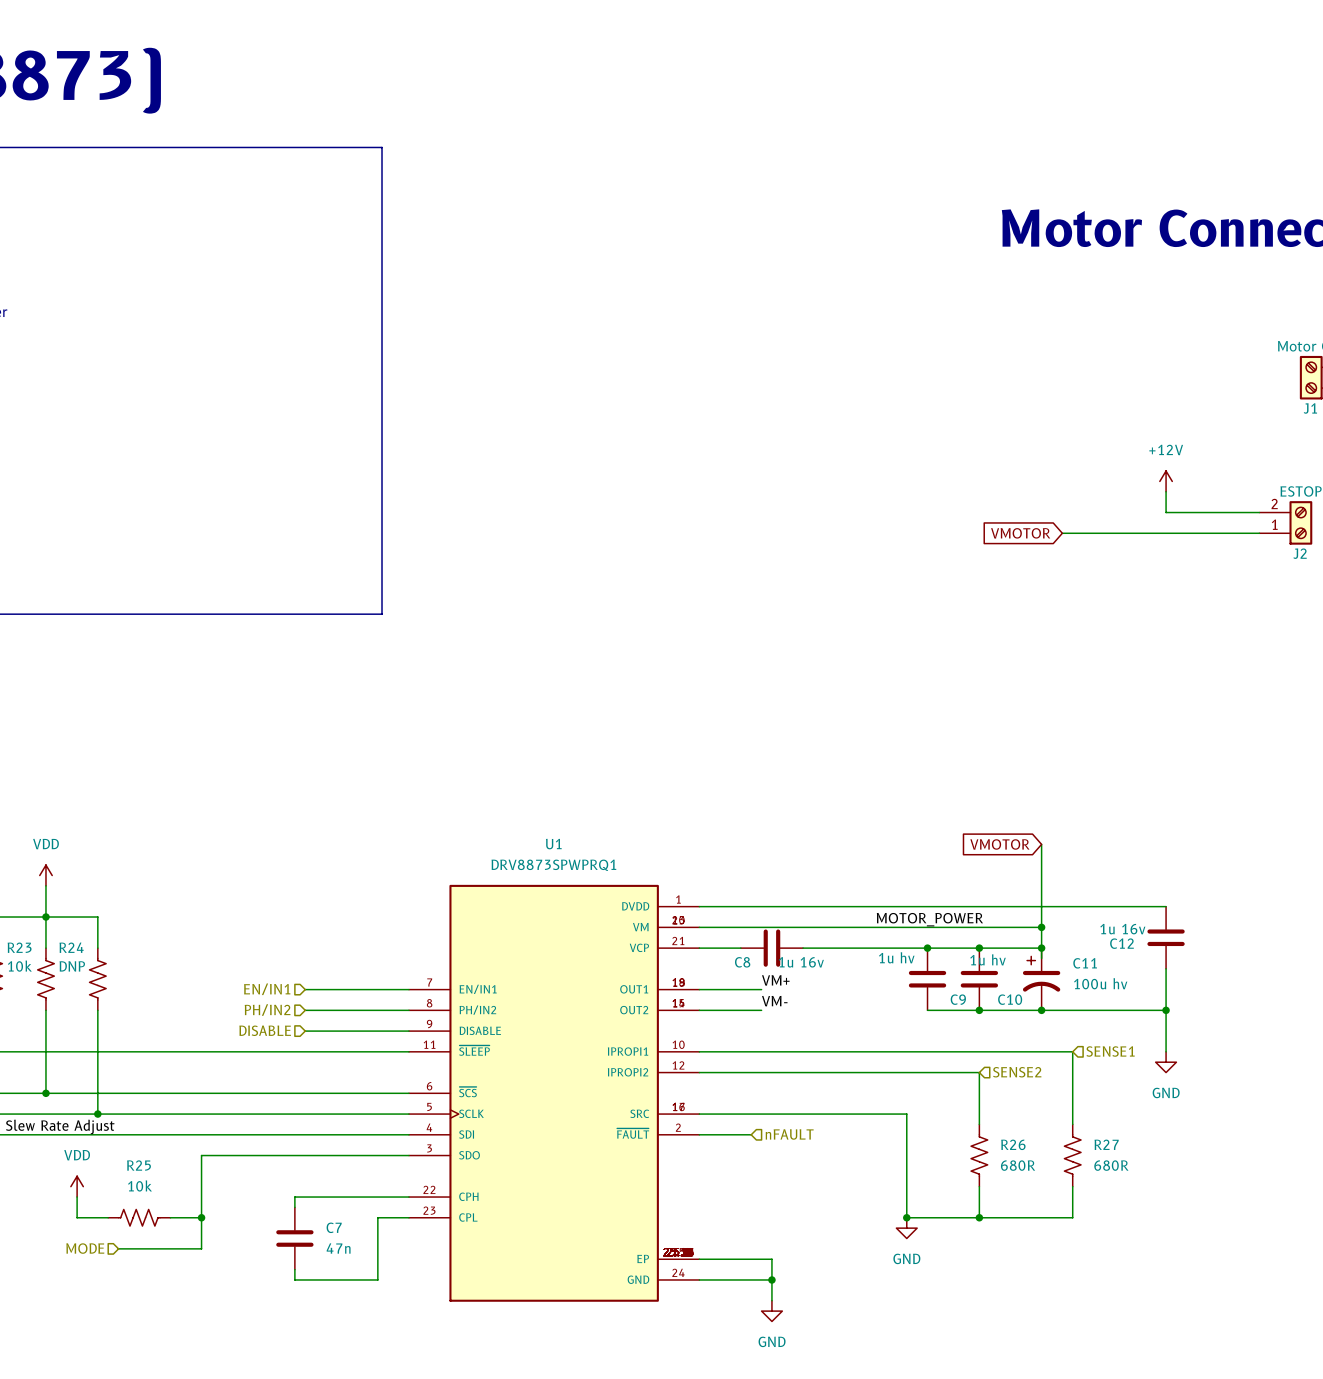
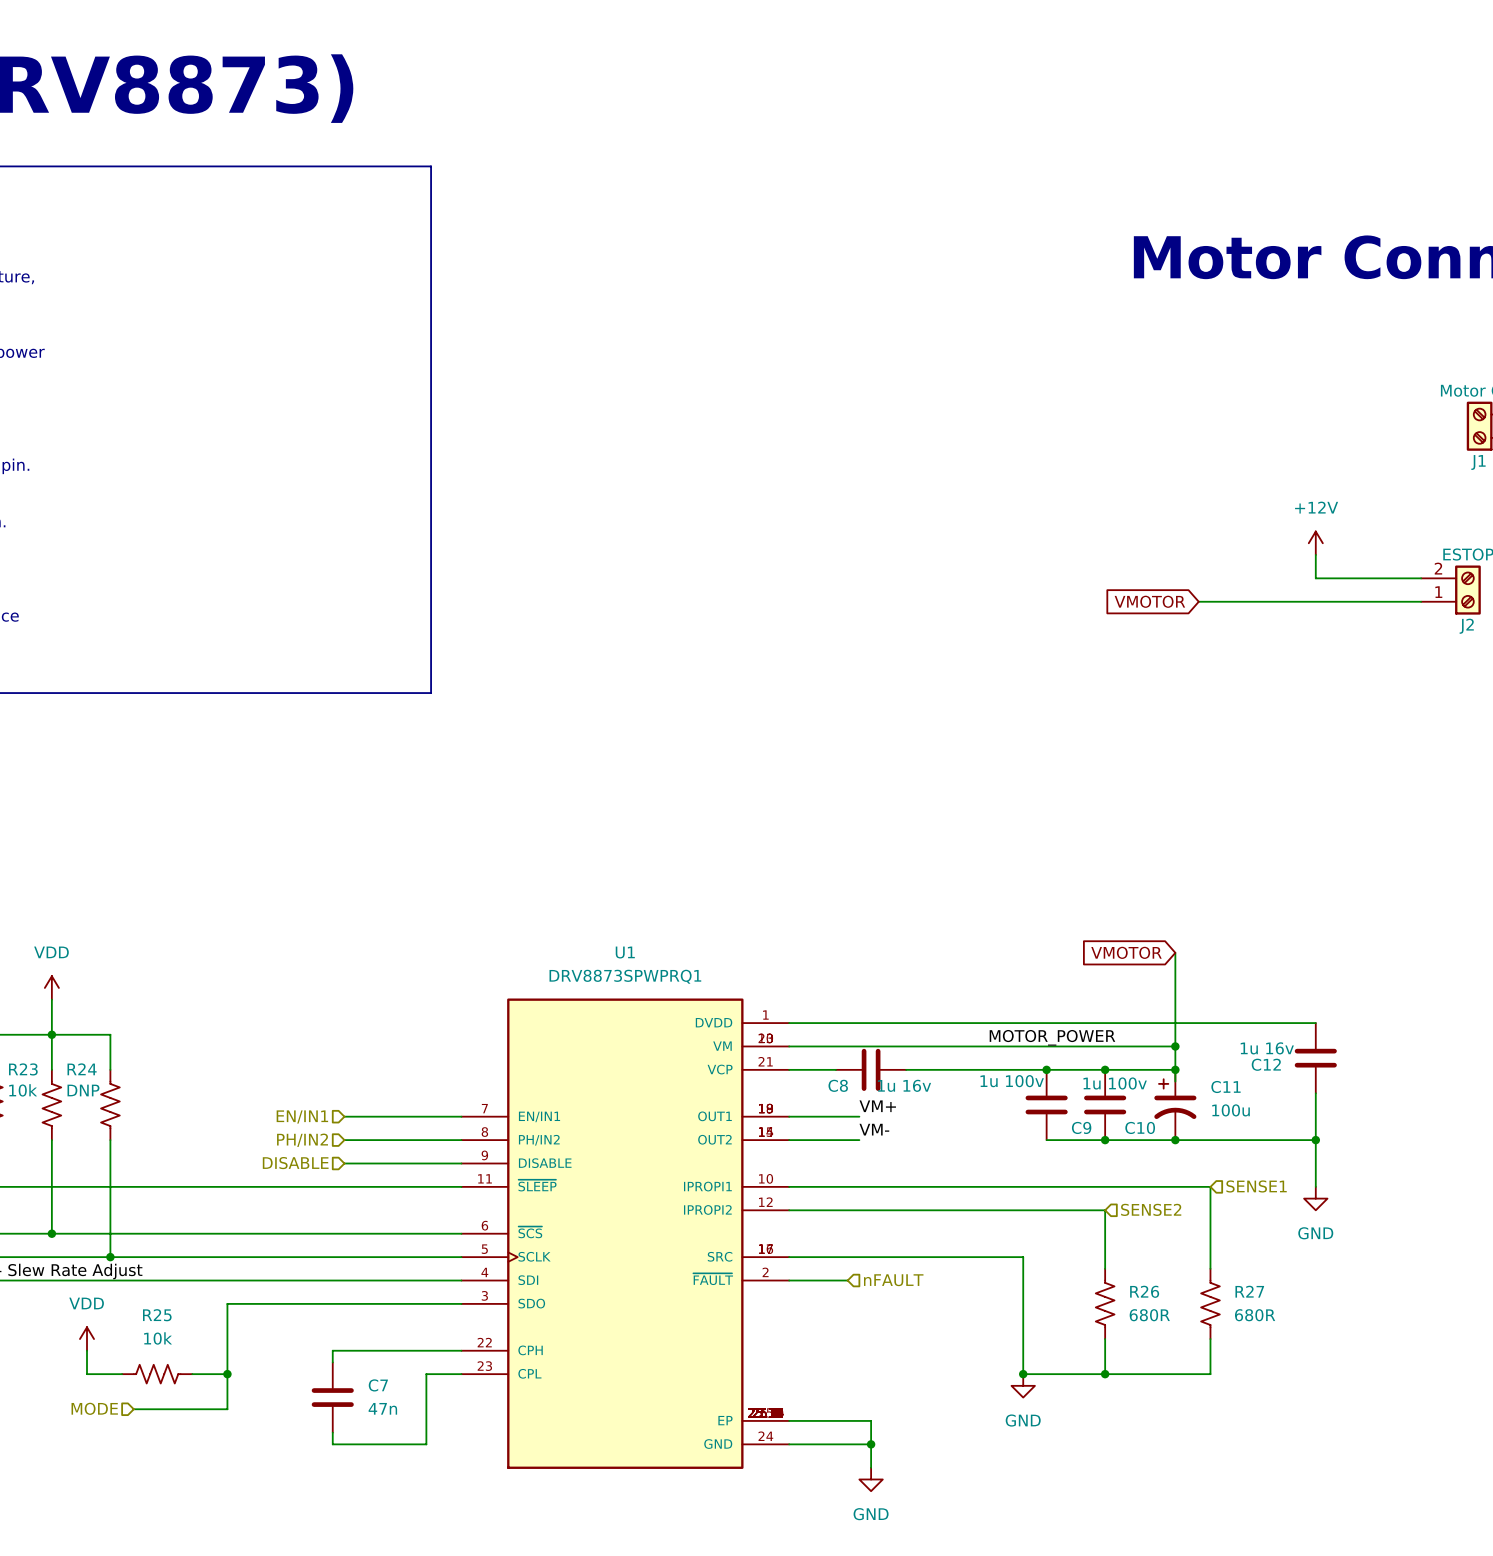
C9 value: 1u hv (896, 957) -> 1u 100v (1012, 1081)
C10 value: 1u hv (988, 959) -> 1u 100v (1115, 1083)
C11 value: 100u hv (1100, 983) -> 100u (1231, 1110)

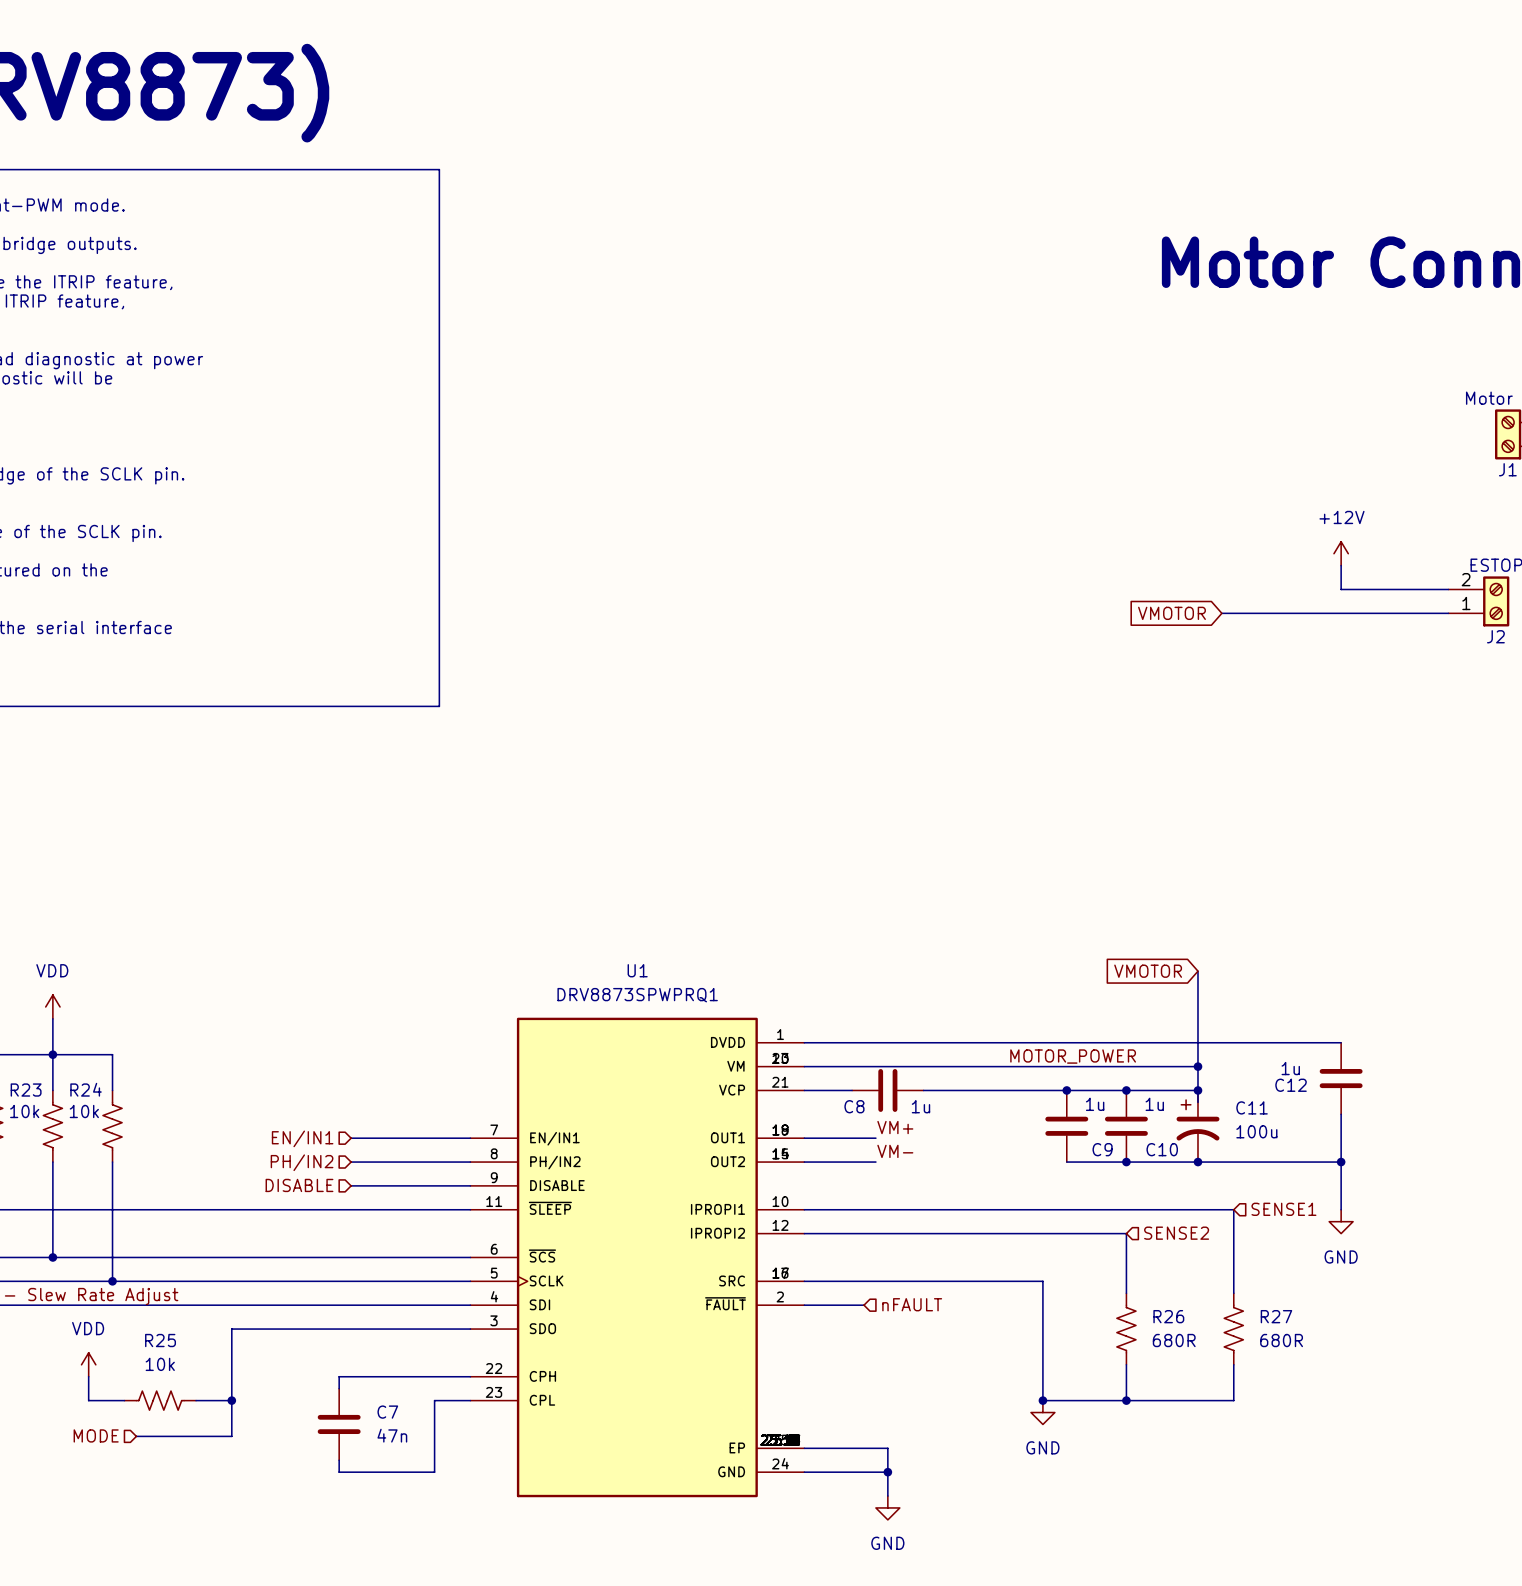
C12 value: 1u 16v (1267, 1048) -> 1u (1290, 1068)
C9 value: 1u 100v (1012, 1081) -> 1u (1095, 1104)
C10 value: 1u 100v (1115, 1083) -> 1u (1154, 1104)
C8 value: 1u 16v (904, 1085) -> 1u (920, 1106)
R24 value: DNP (83, 1090) -> 10k (84, 1111)

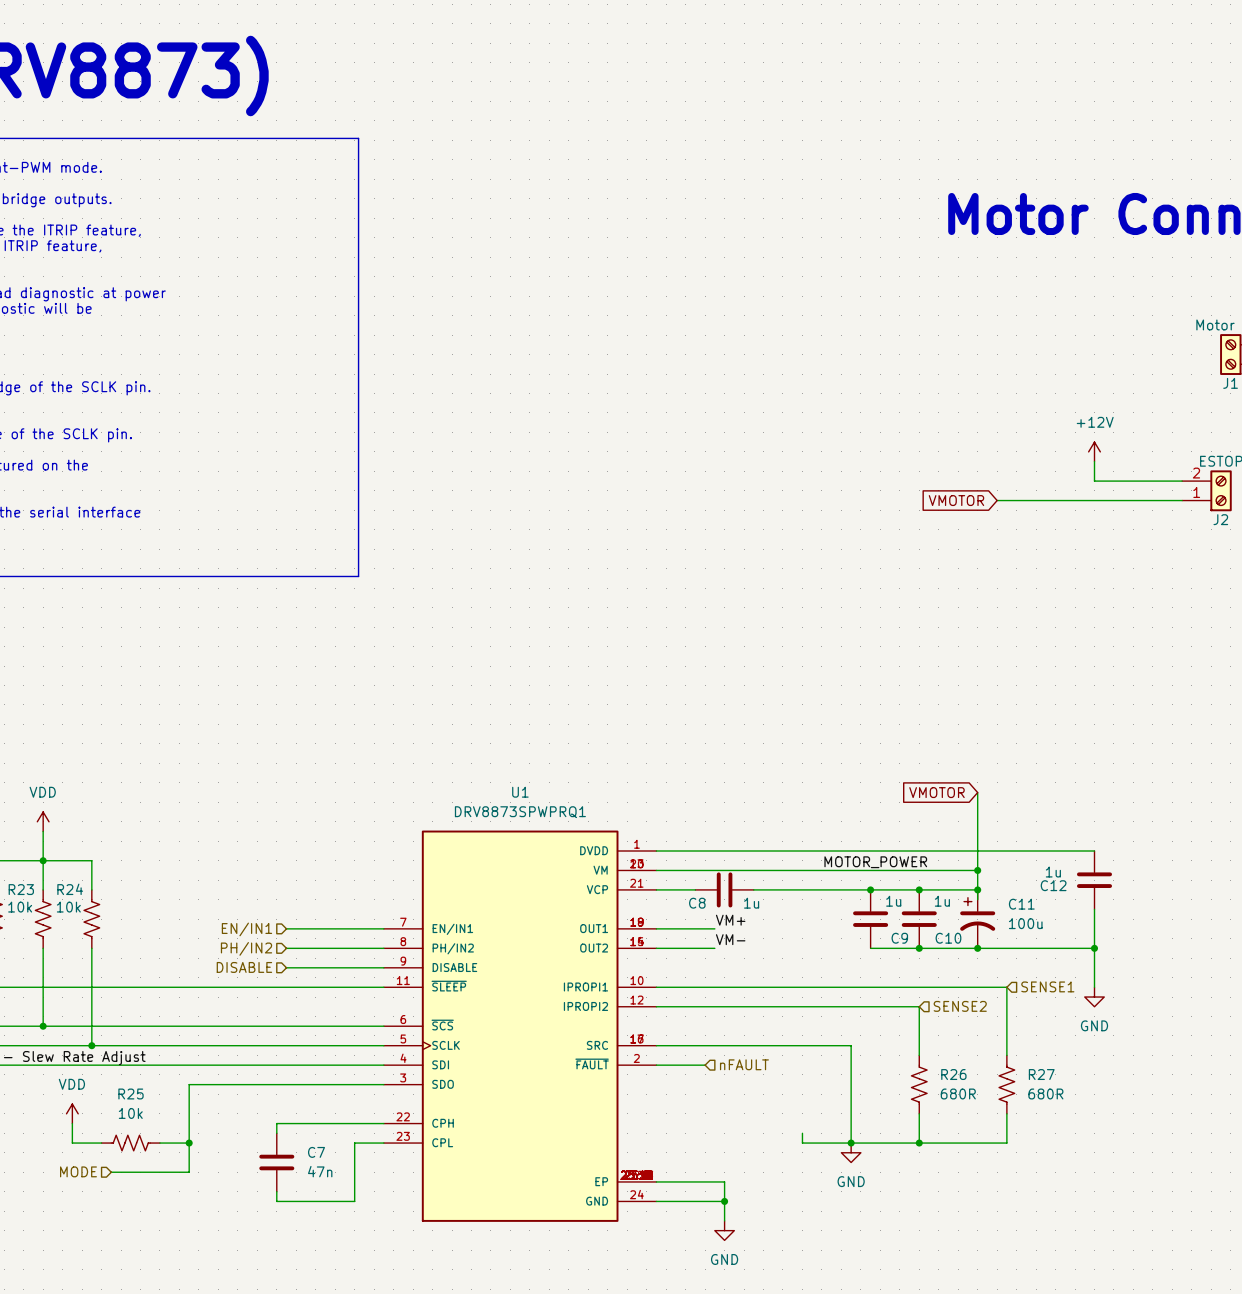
wire: none -> (802, 1133) (802, 1143) (851, 1143)

